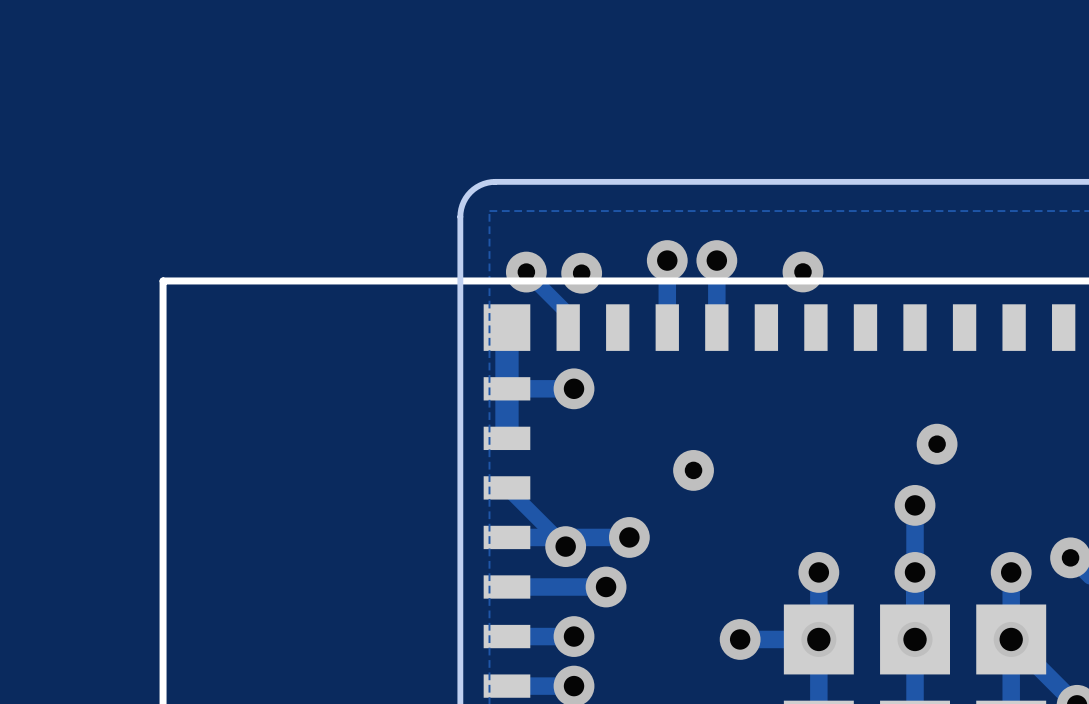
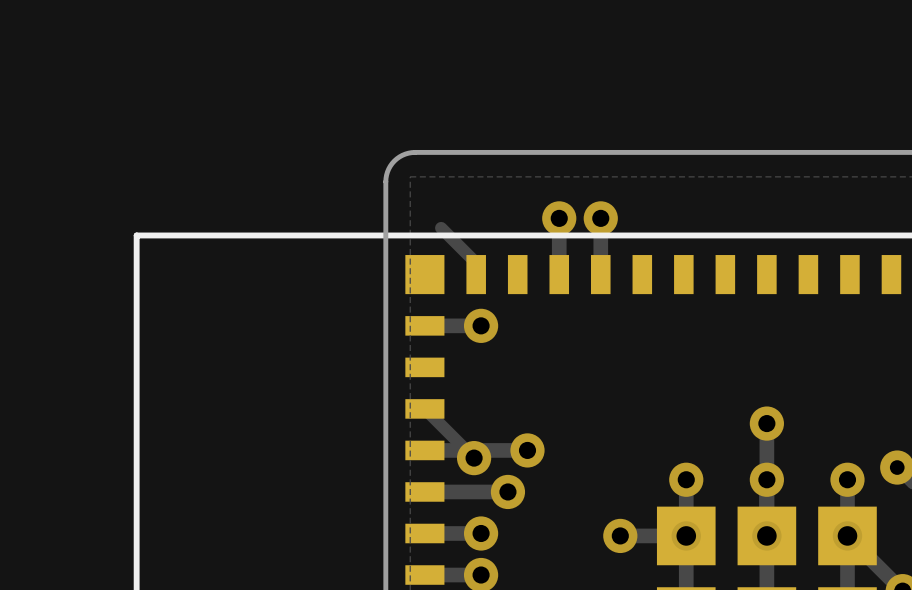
via: (802, 271) -> none
via: (526, 272) -> none
via: (581, 273) -> none
track: (506, 327) (506, 438) -> none
via: (937, 444) -> none
via: (693, 470) -> none

